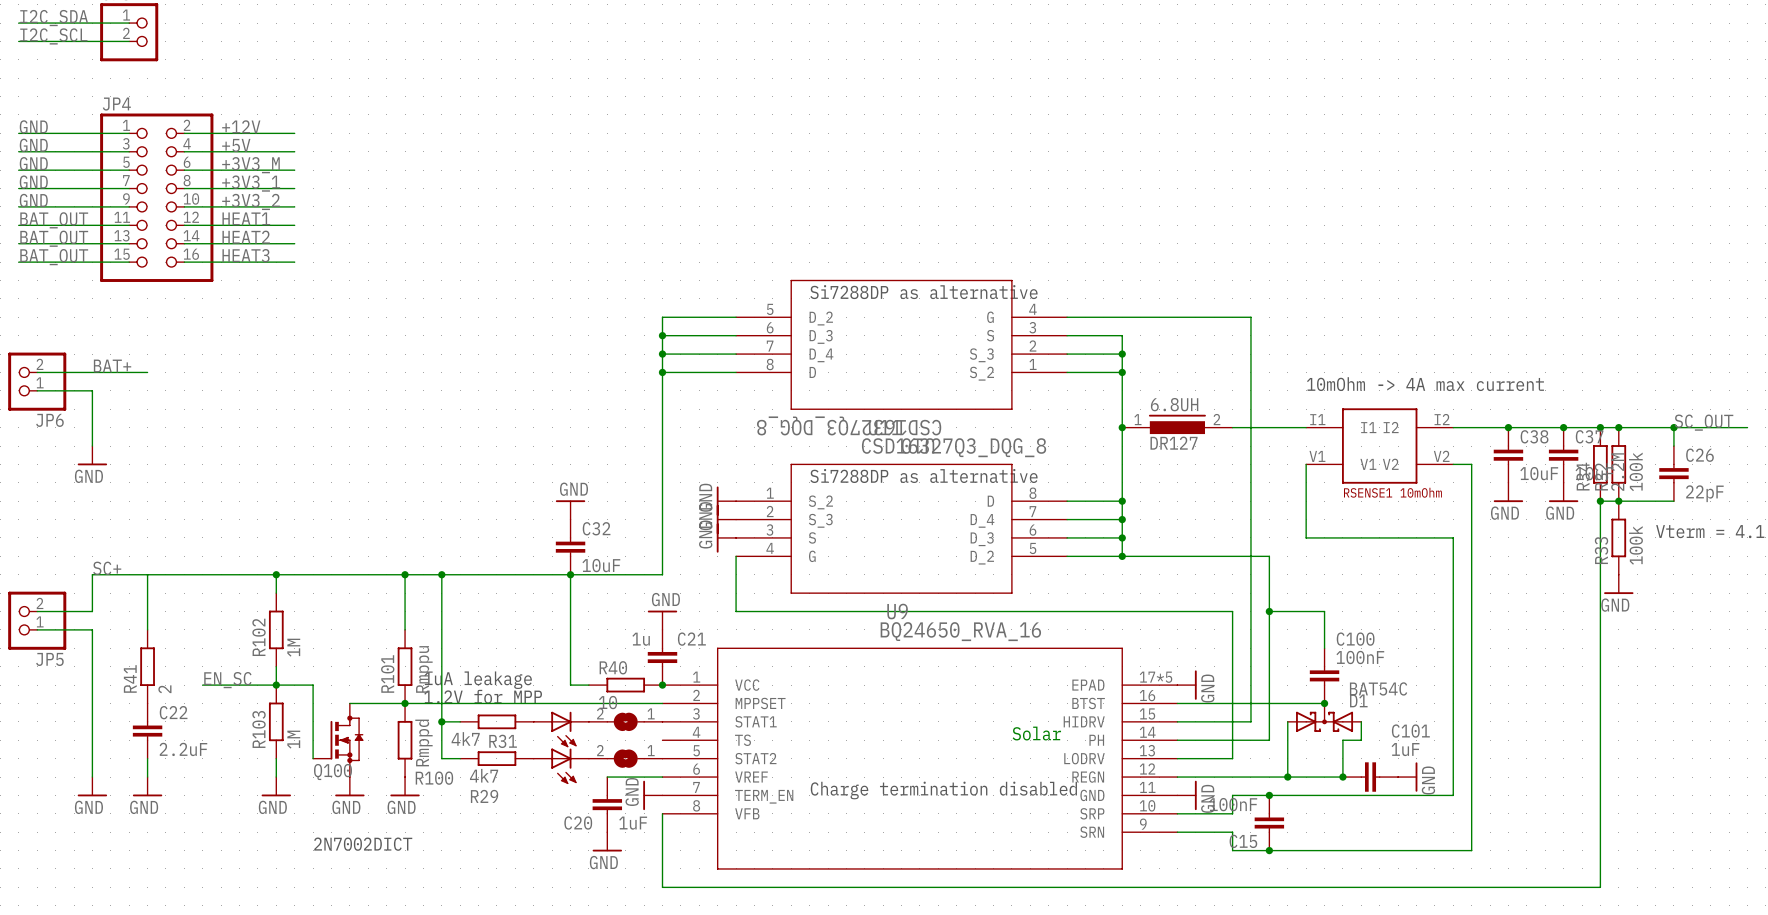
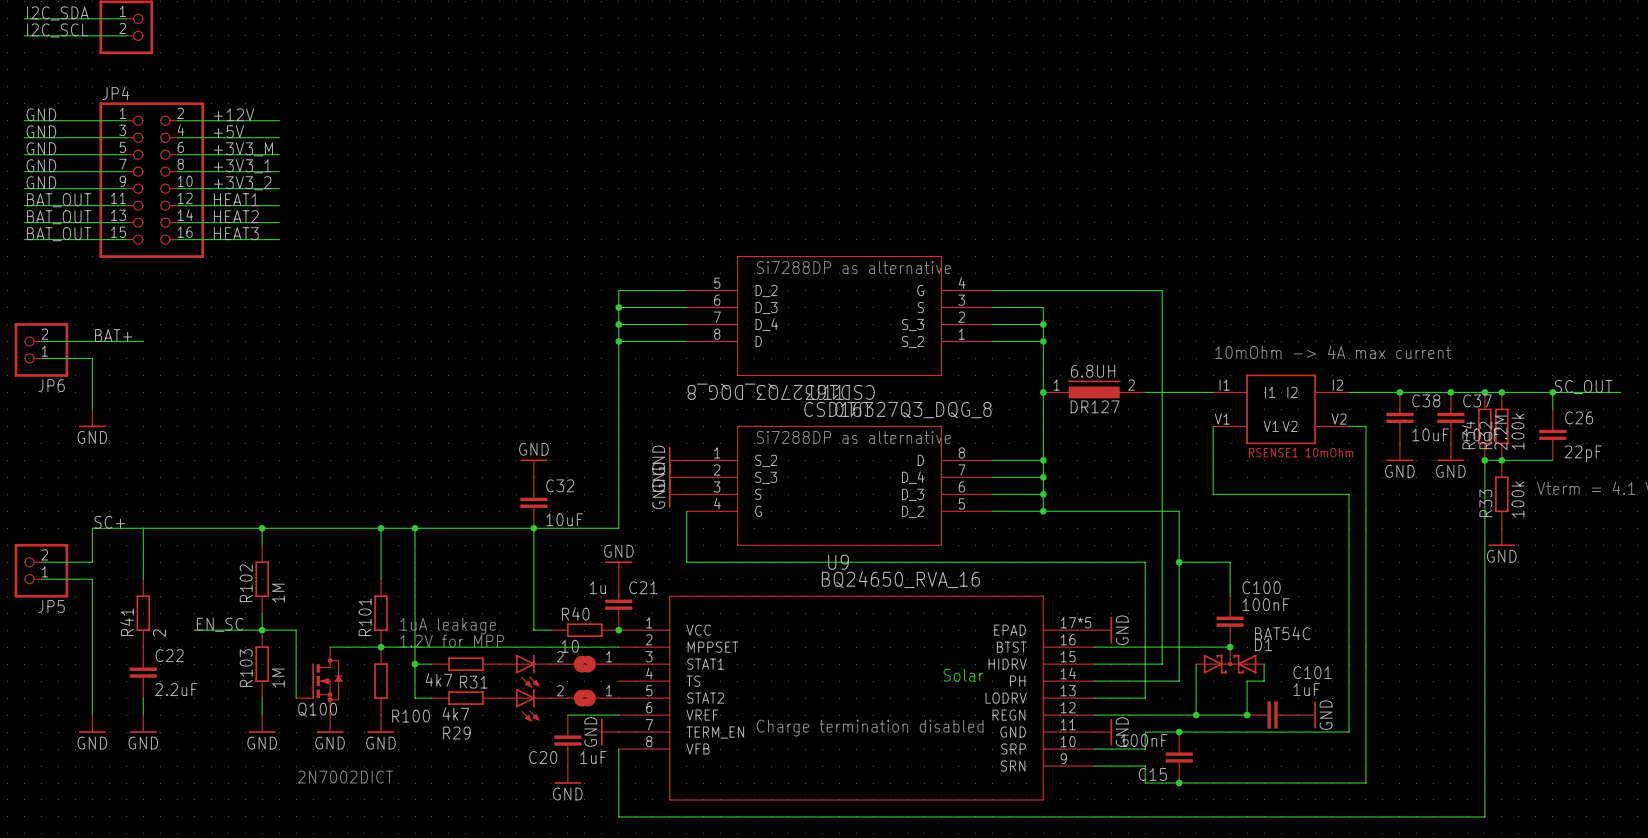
R101 value: Rmppu (424, 669) -> none
R100 value: Rmppd (423, 742) -> none

